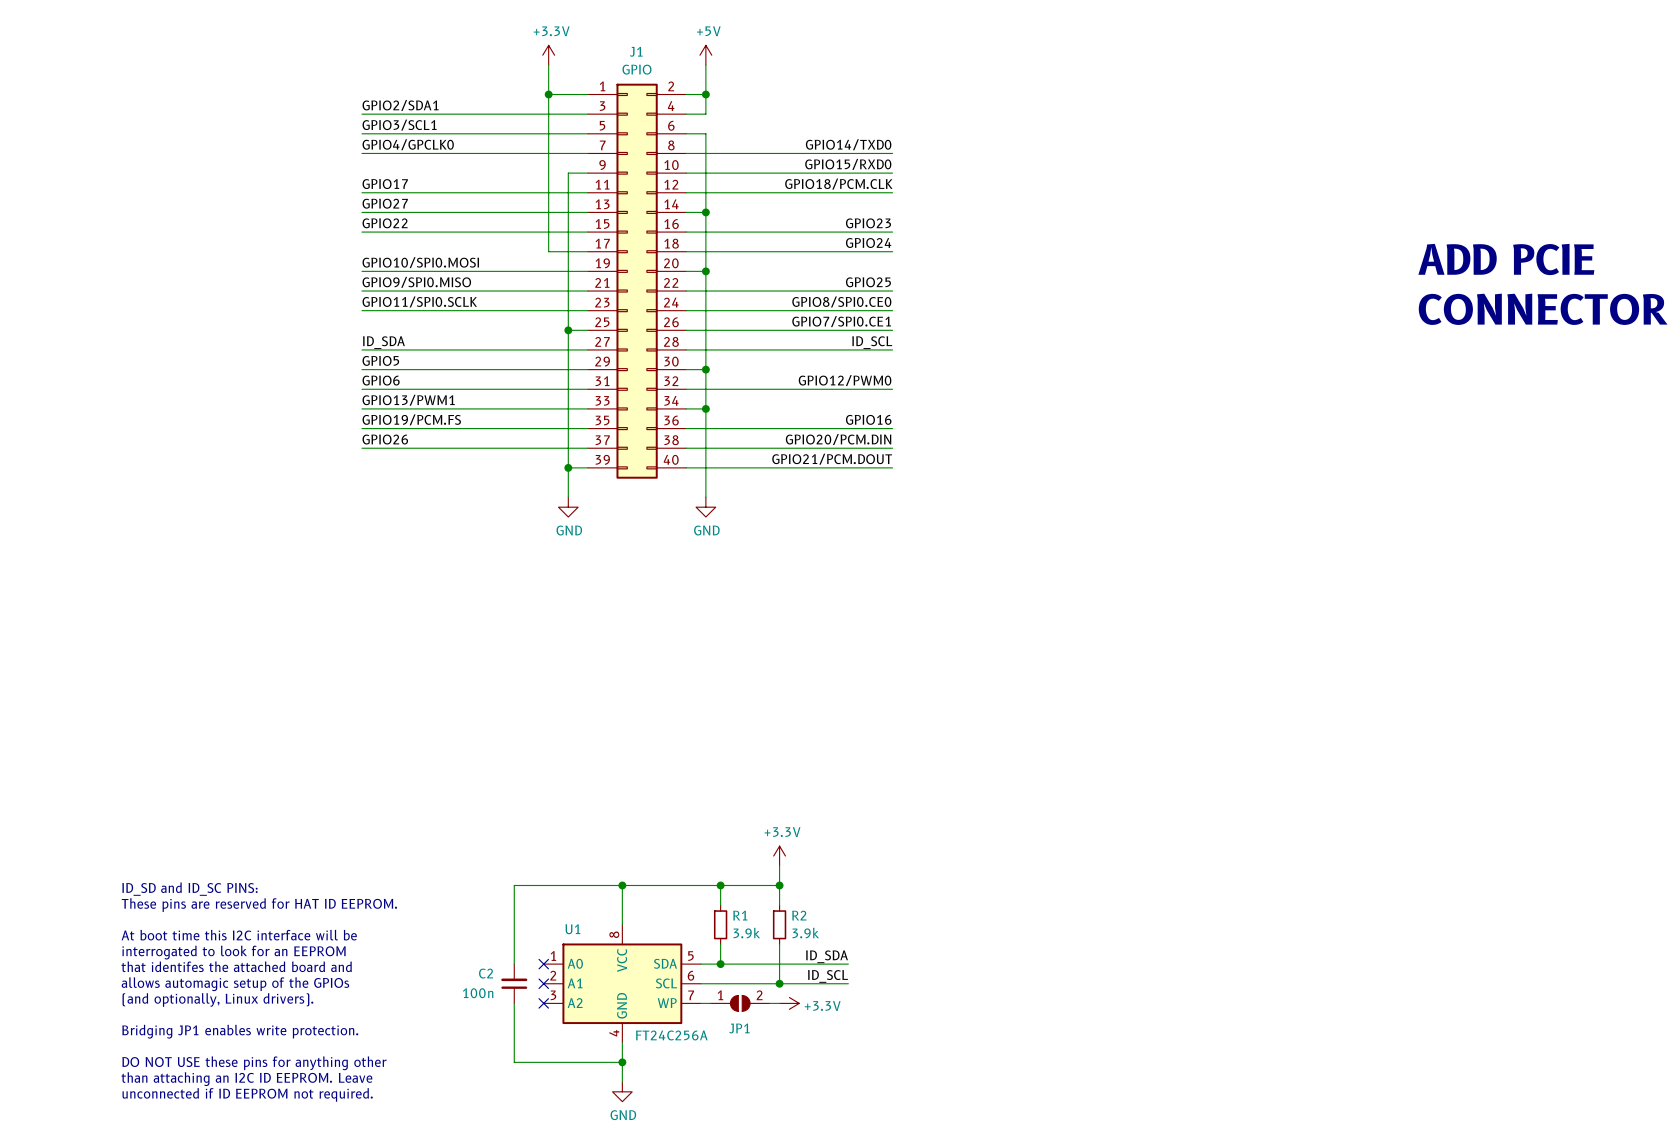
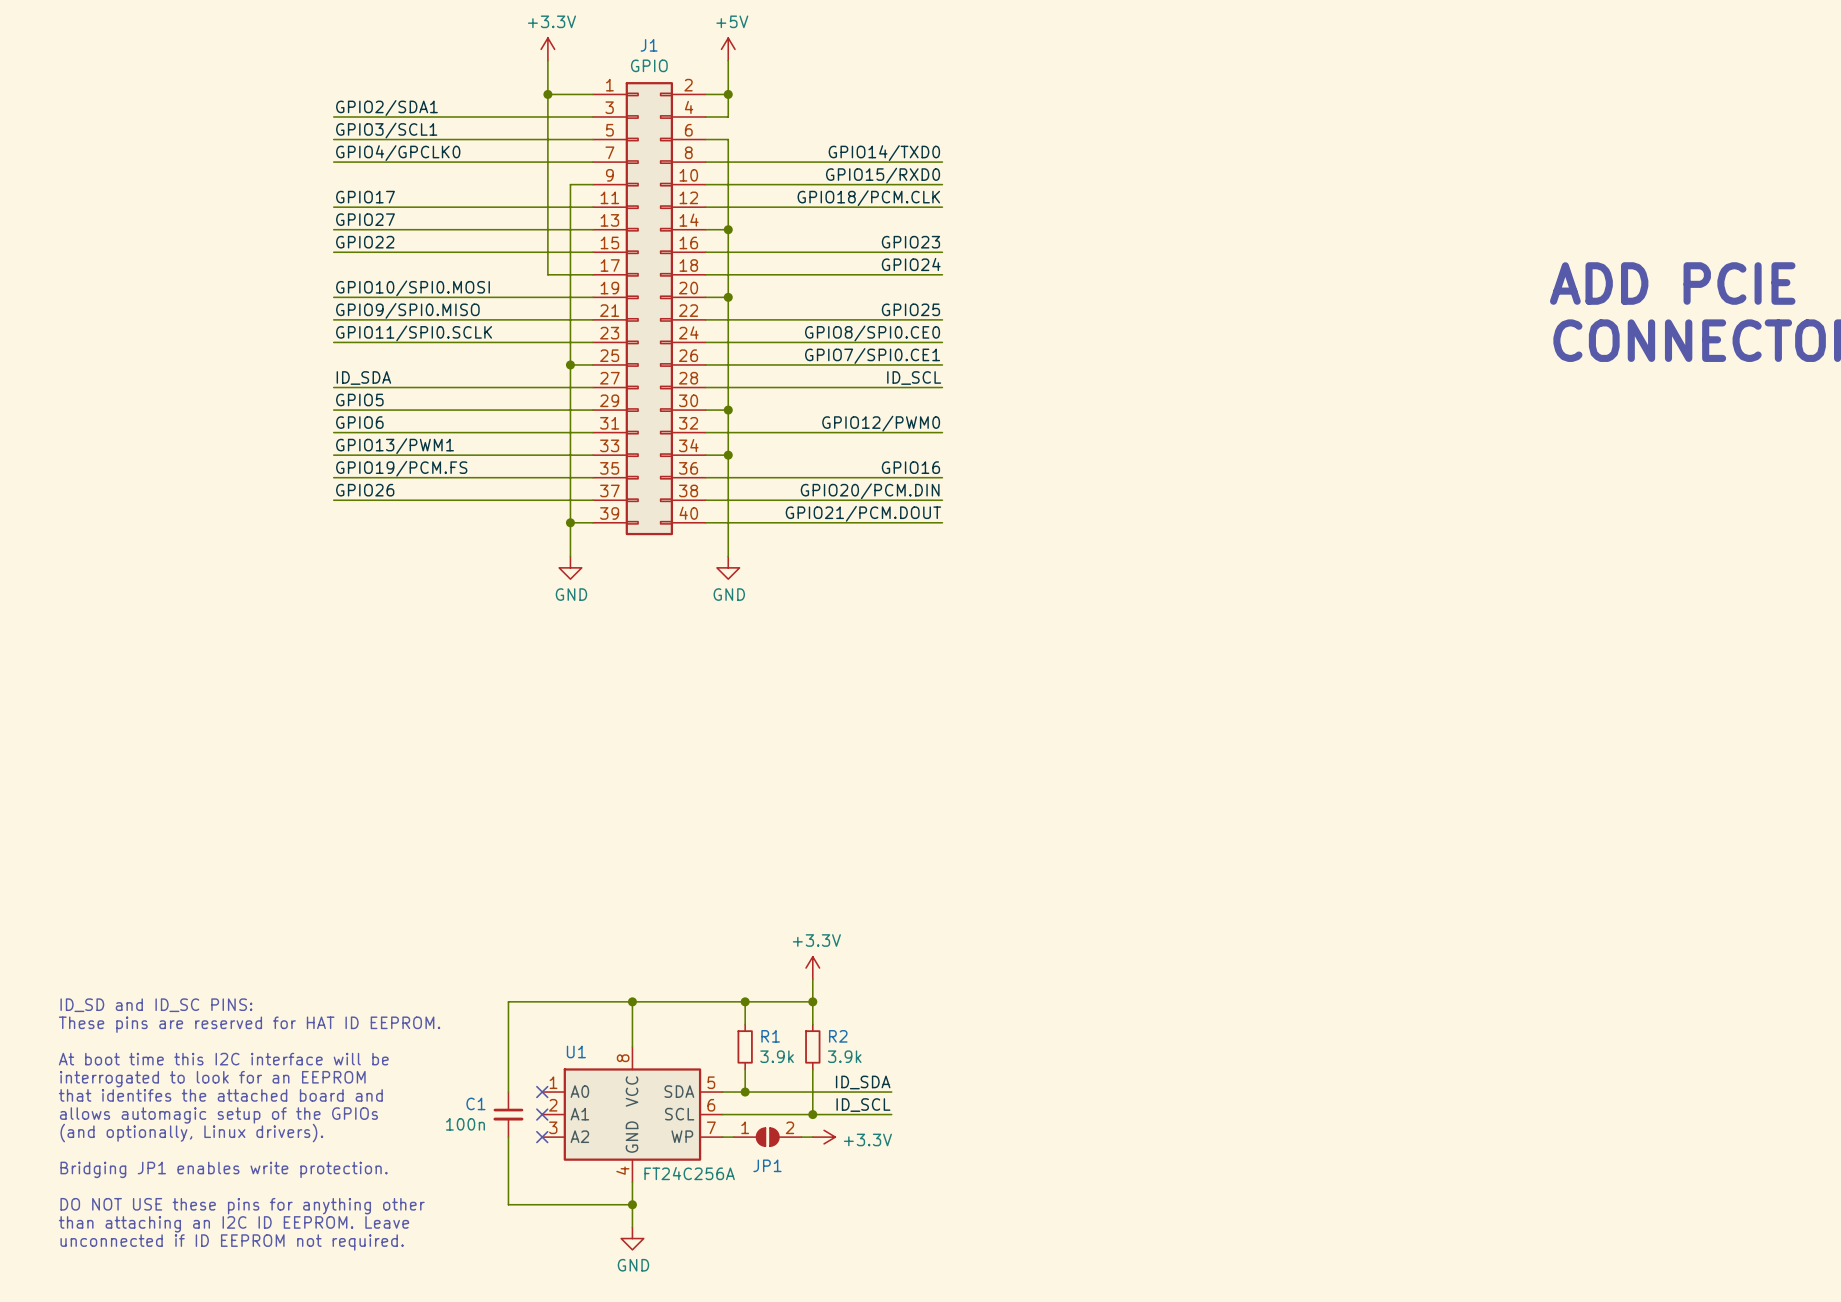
C2: 100n (514, 983) -> none
C1: none -> 100n (508, 1114)

